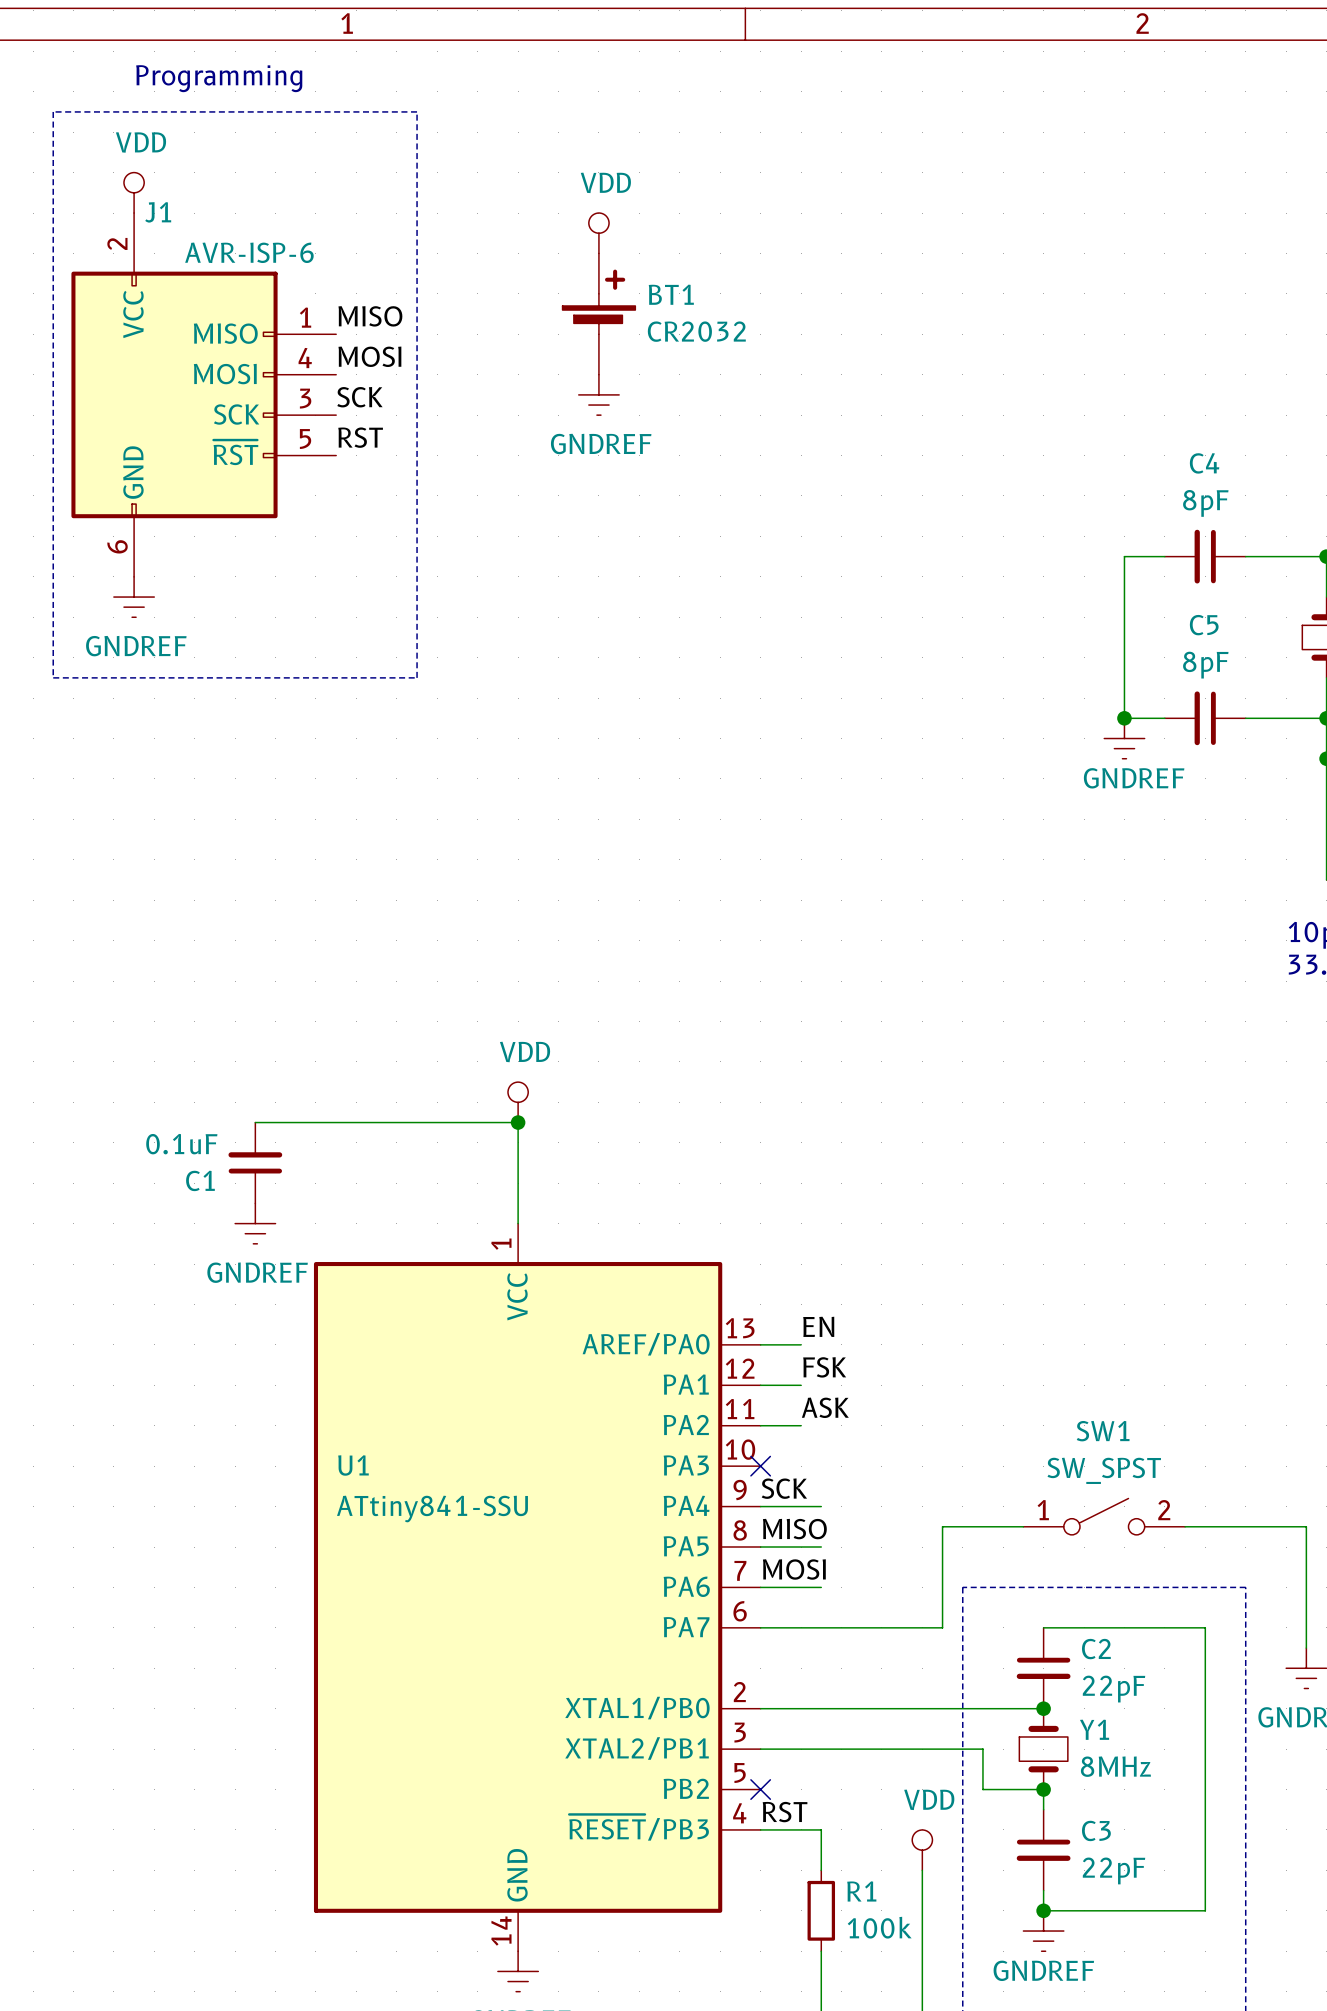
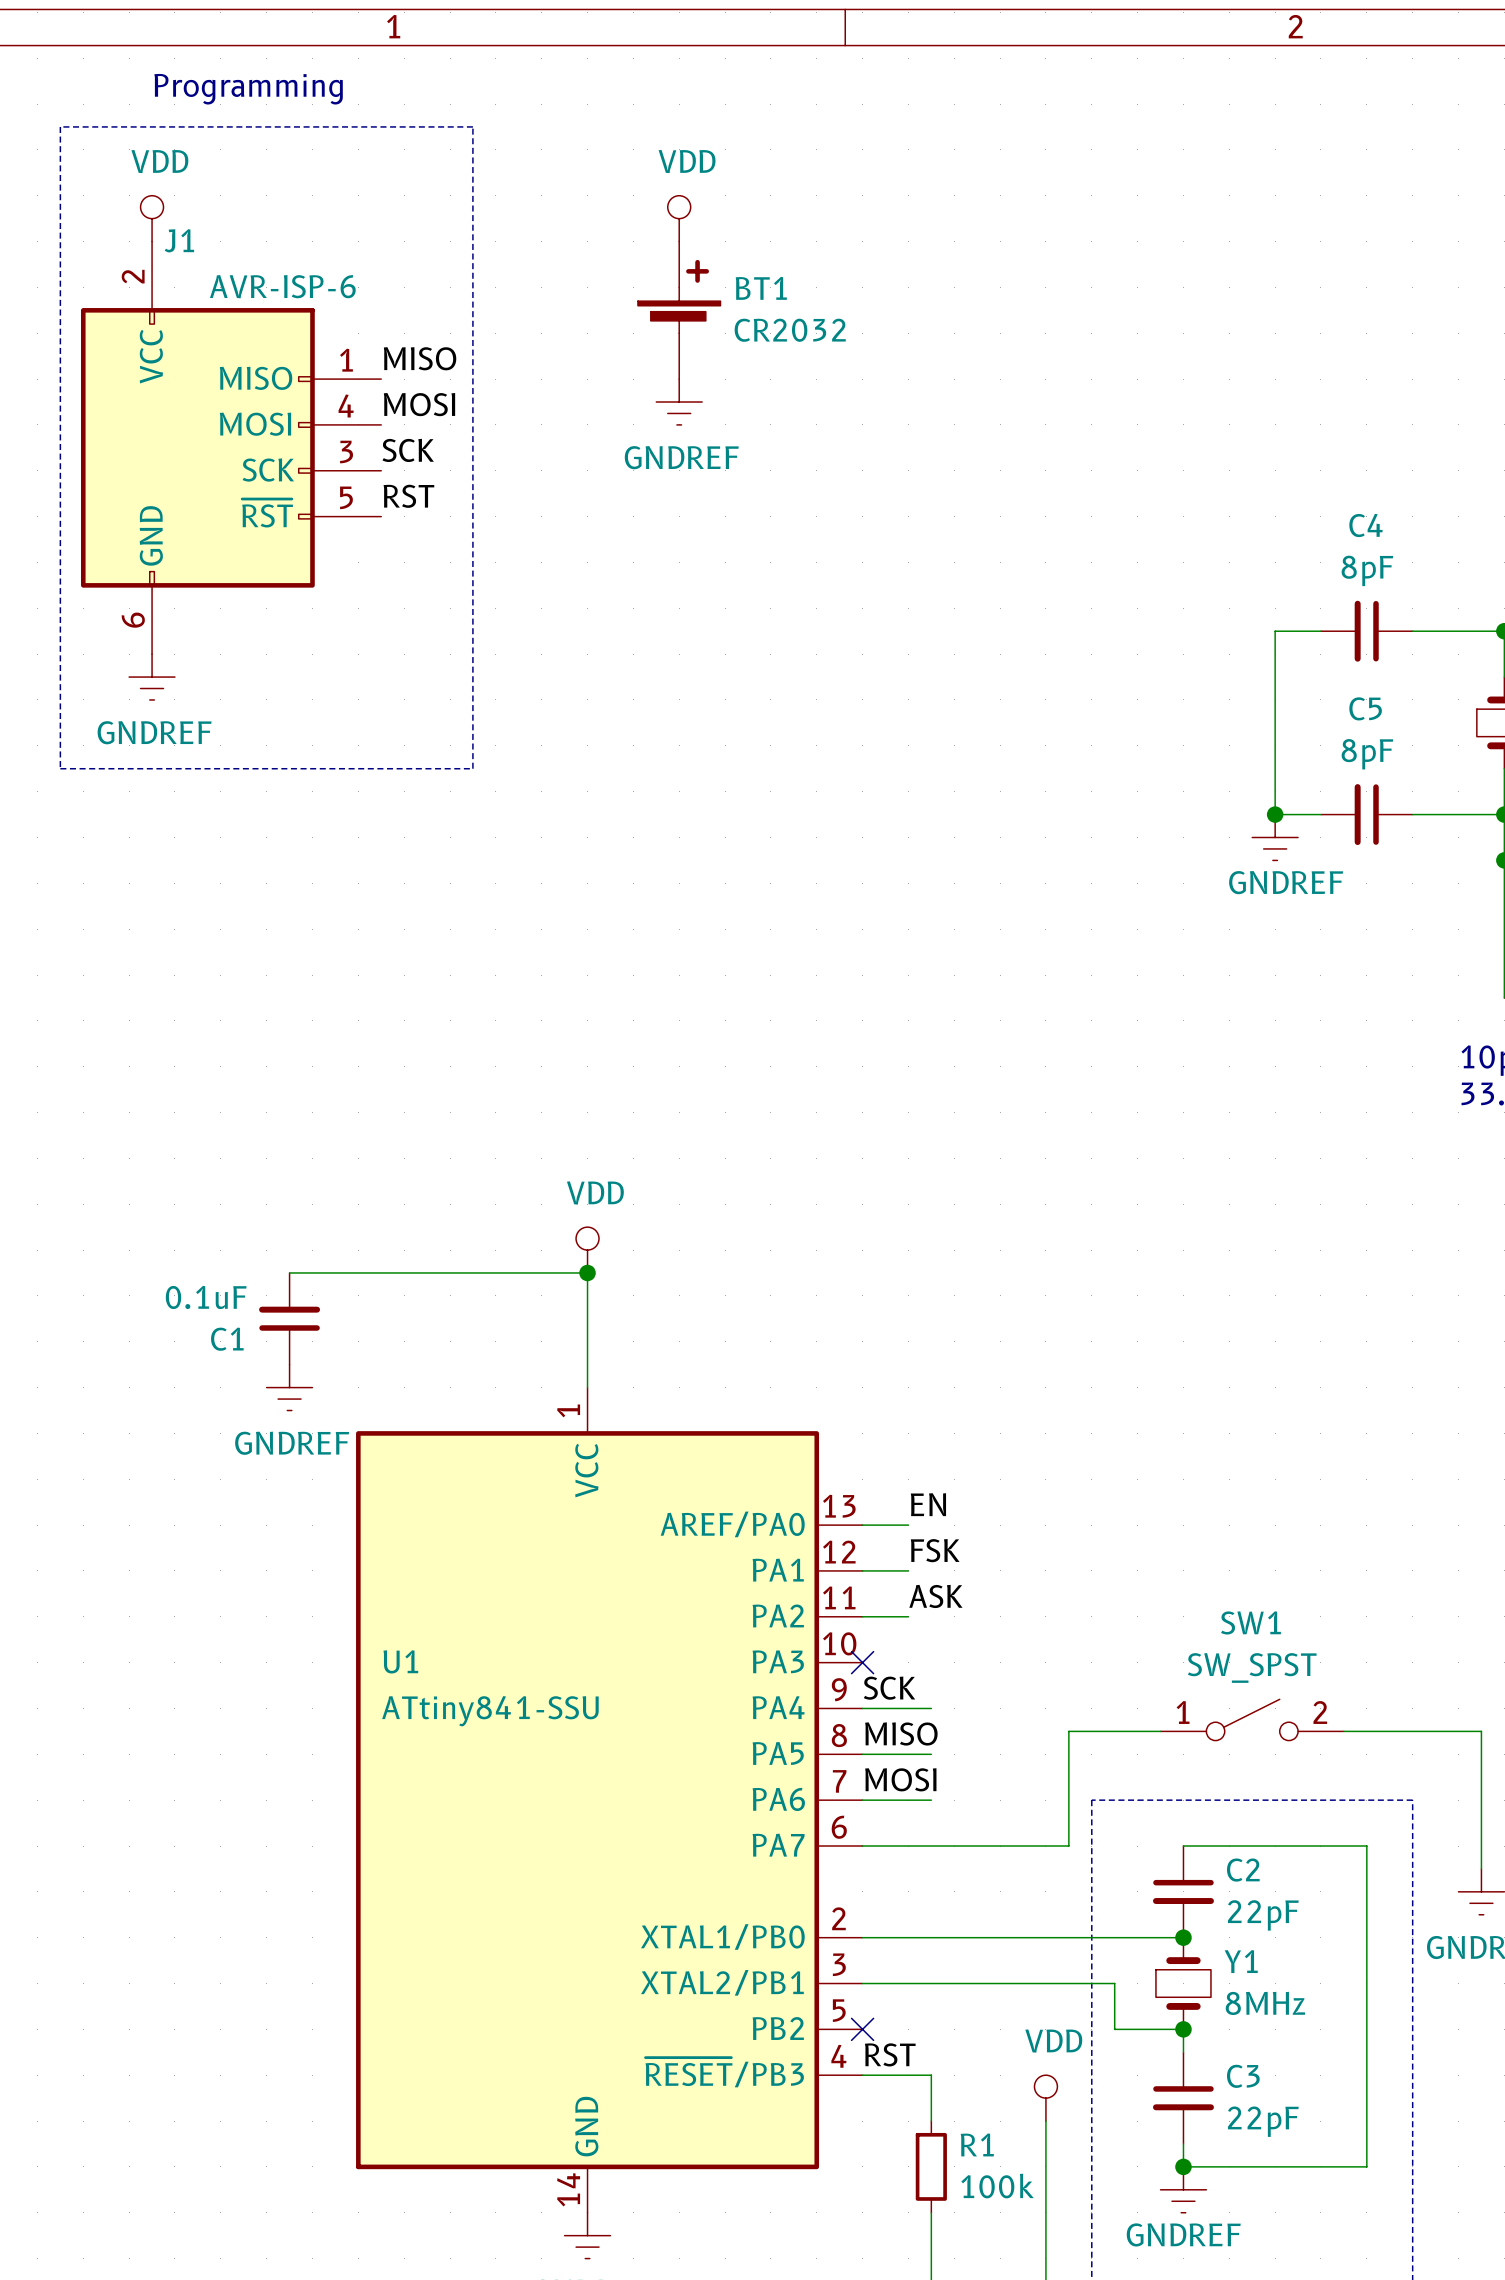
power symbol position: VDD (598, 233) -> VDD (679, 218)
BT1 position: (598, 314) -> (679, 310)
power symbol position: GNDREF (598, 394) -> GNDREF (679, 402)

